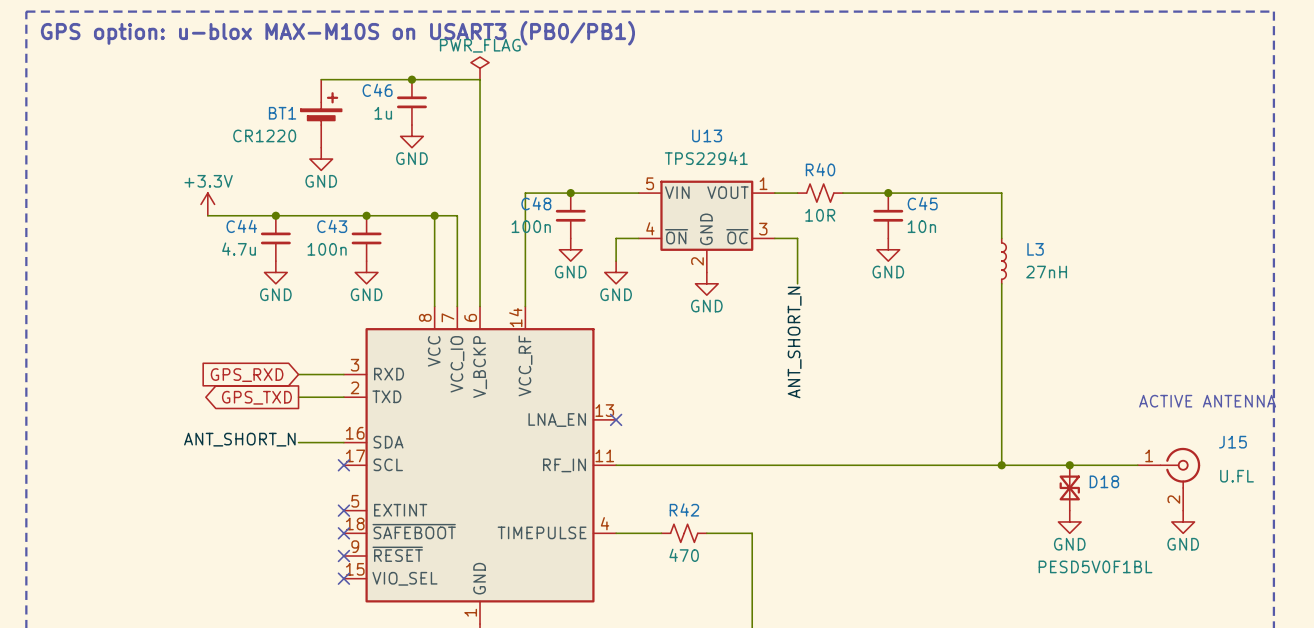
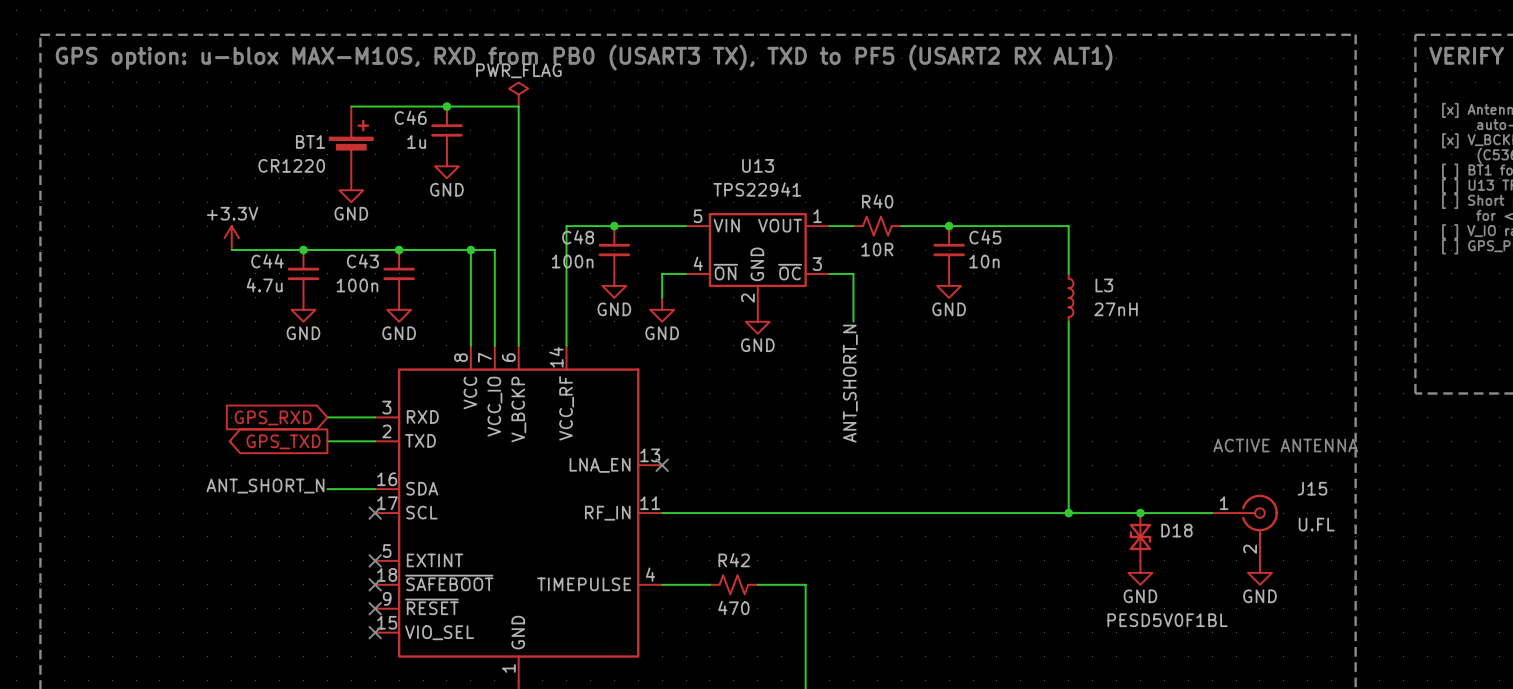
text: GPS option: u-blox MAX-M10S on USART3 (PB0/PB1) (337, 33) -> GPS option: u-blox MAX-M10S, RXD from PB0 (USART3 TX), TXD to PF5 (USART2 RX ALT1) (584, 57)

